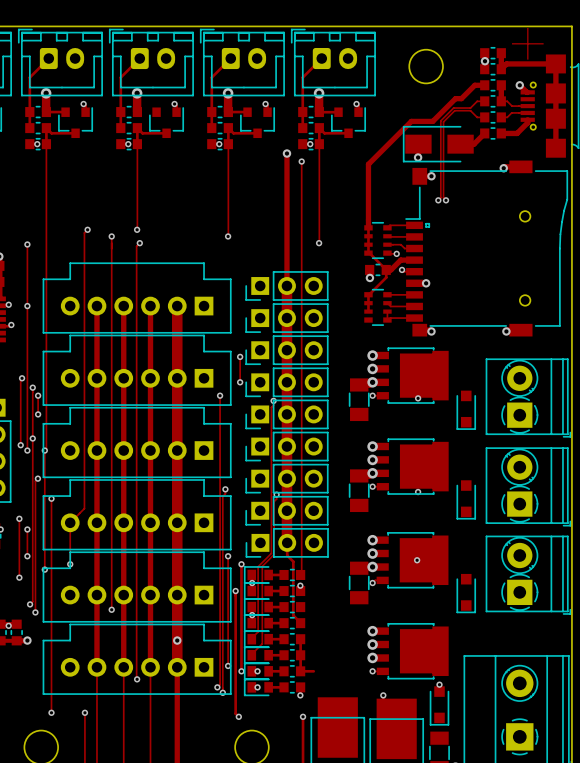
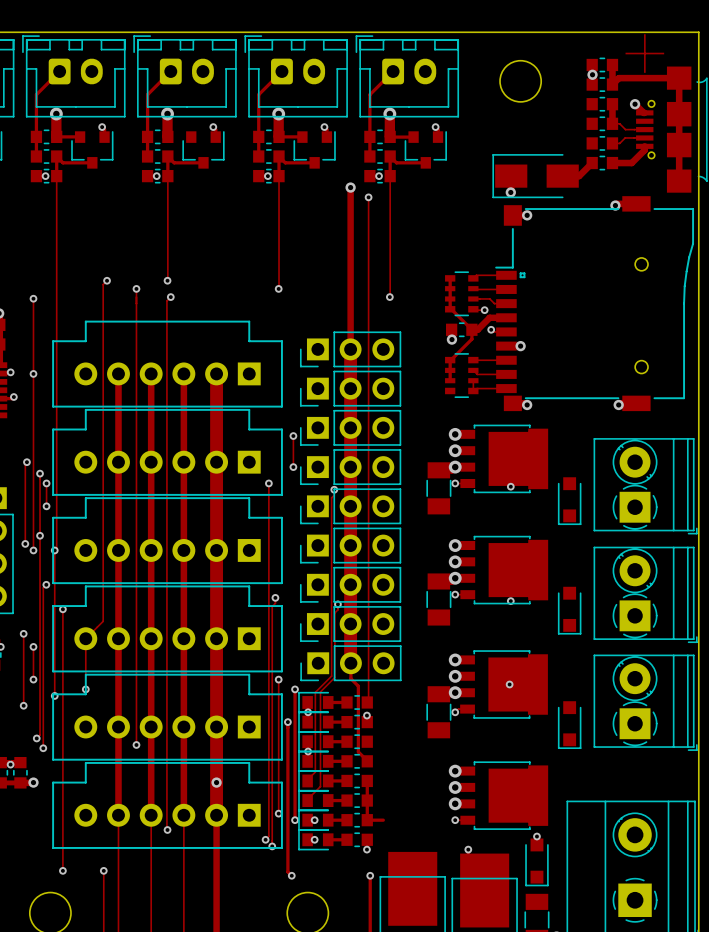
track: (484, 85) (474, 85) (461, 98) (455, 98) (432, 121) (411, 121) (368, 164) (368, 227) -> none
track: (484, 101) (477, 101) (470, 108) (453, 108) (440, 120) (440, 197) (438, 200) -> none
track: (484, 117) (477, 117) (470, 110) (454, 110) (443, 121) (443, 197) (446, 200) -> none
via: (438, 200) -> none
via: (446, 200) -> none

